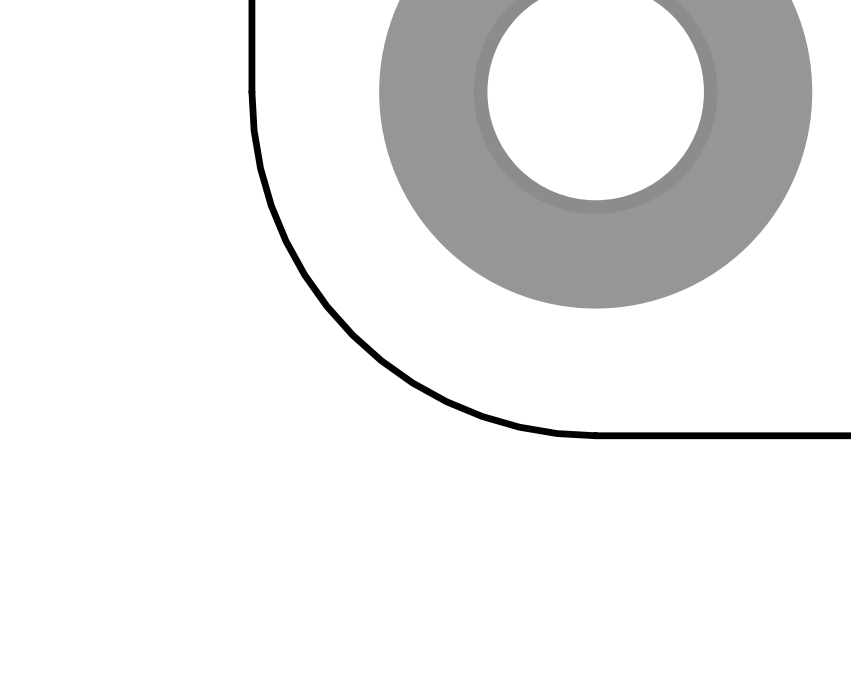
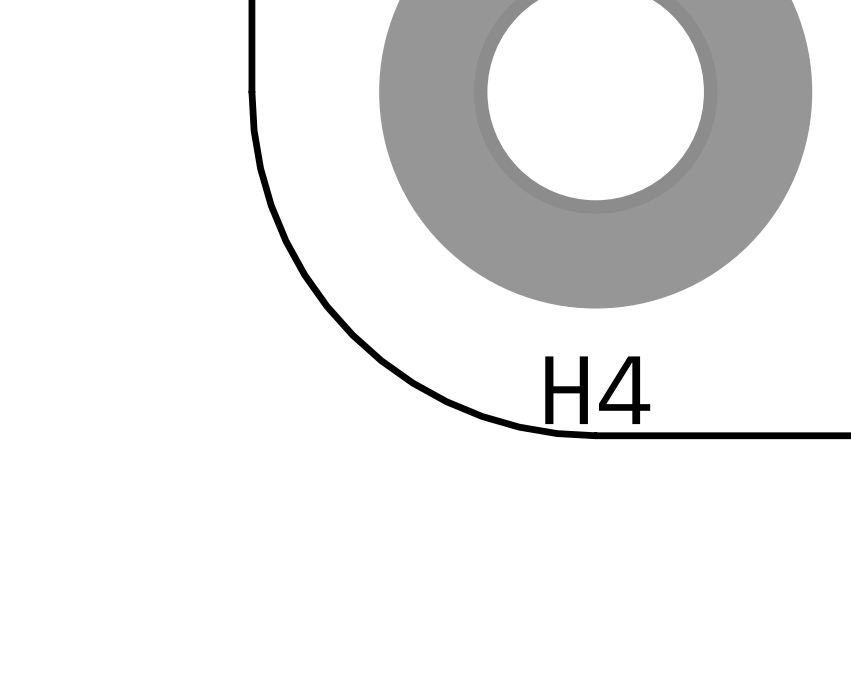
H4 name: none -> H4 (597, 390)

